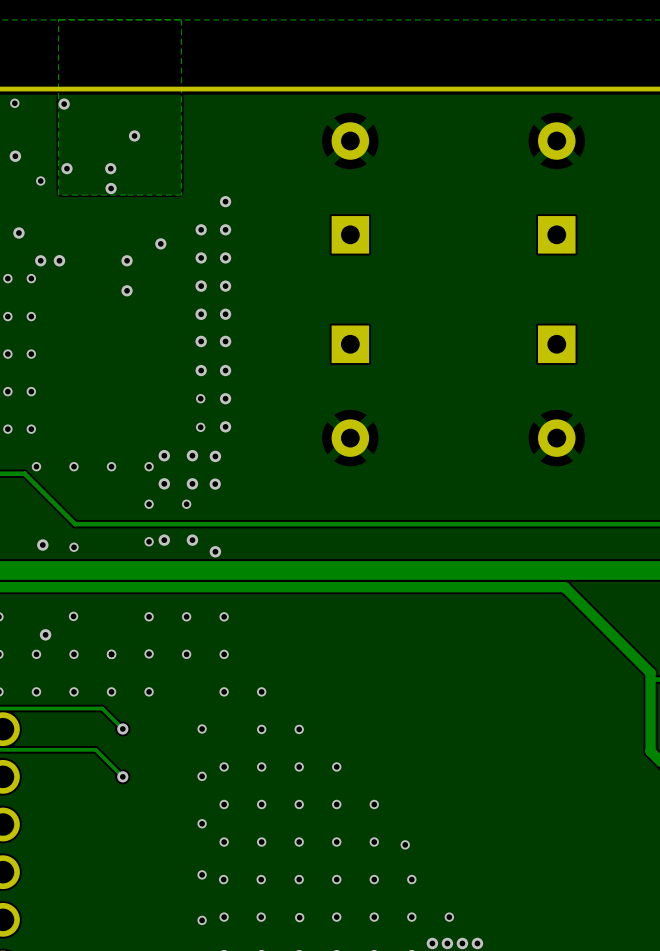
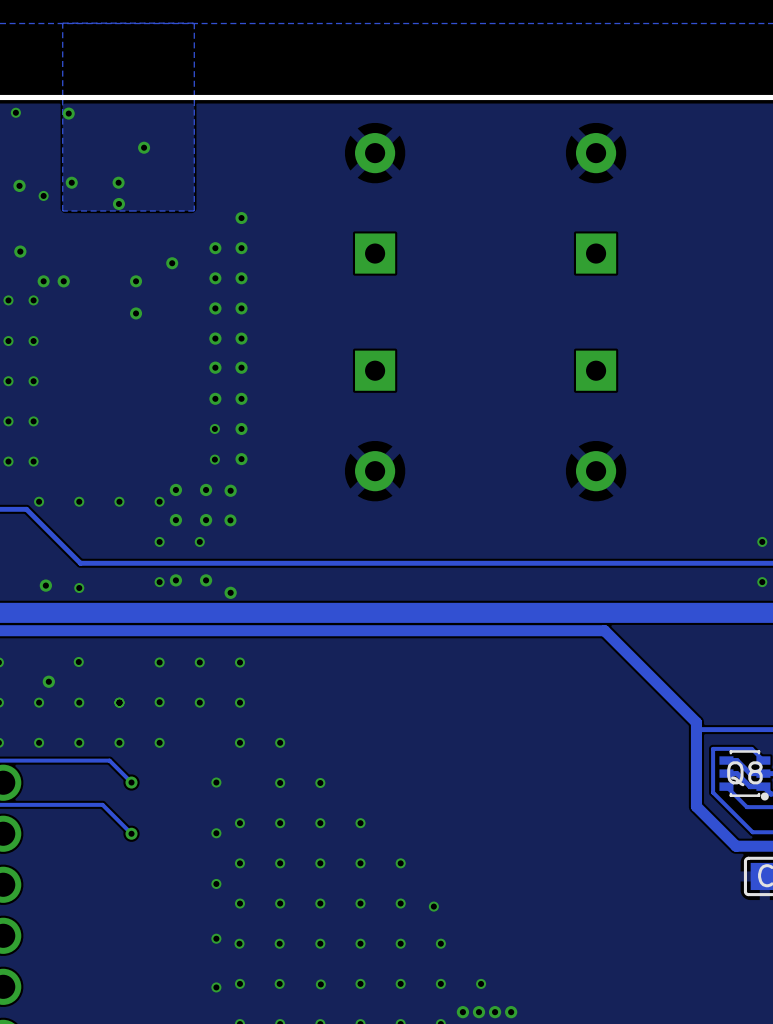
via position: (15, 156) -> (19, 185)

